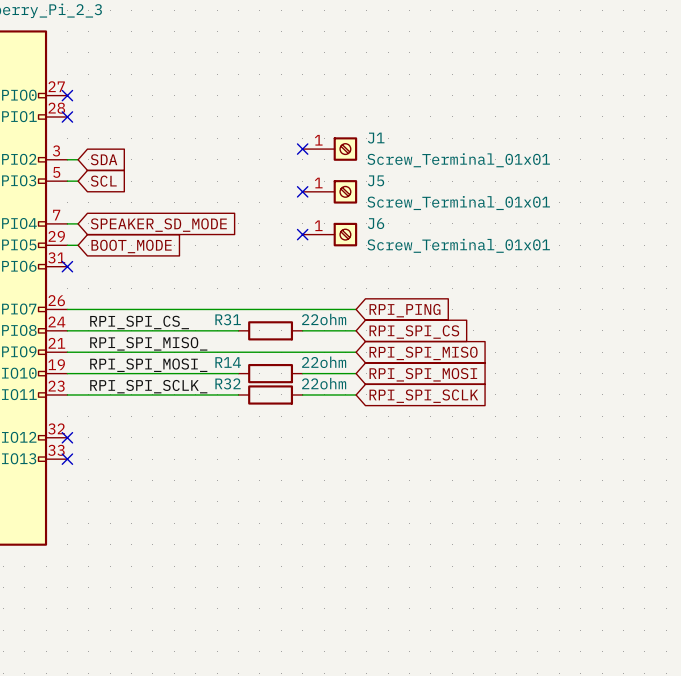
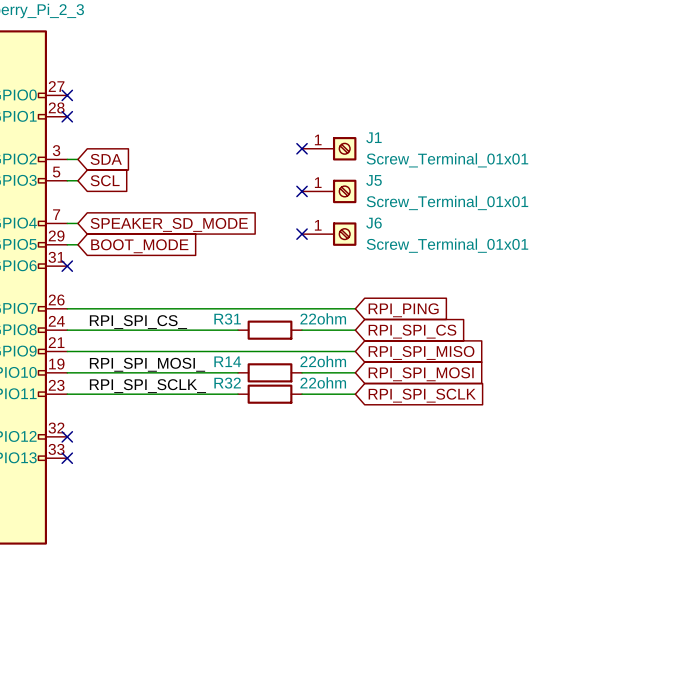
label: RPI_SPI_MISO_ (148, 343) -> none

